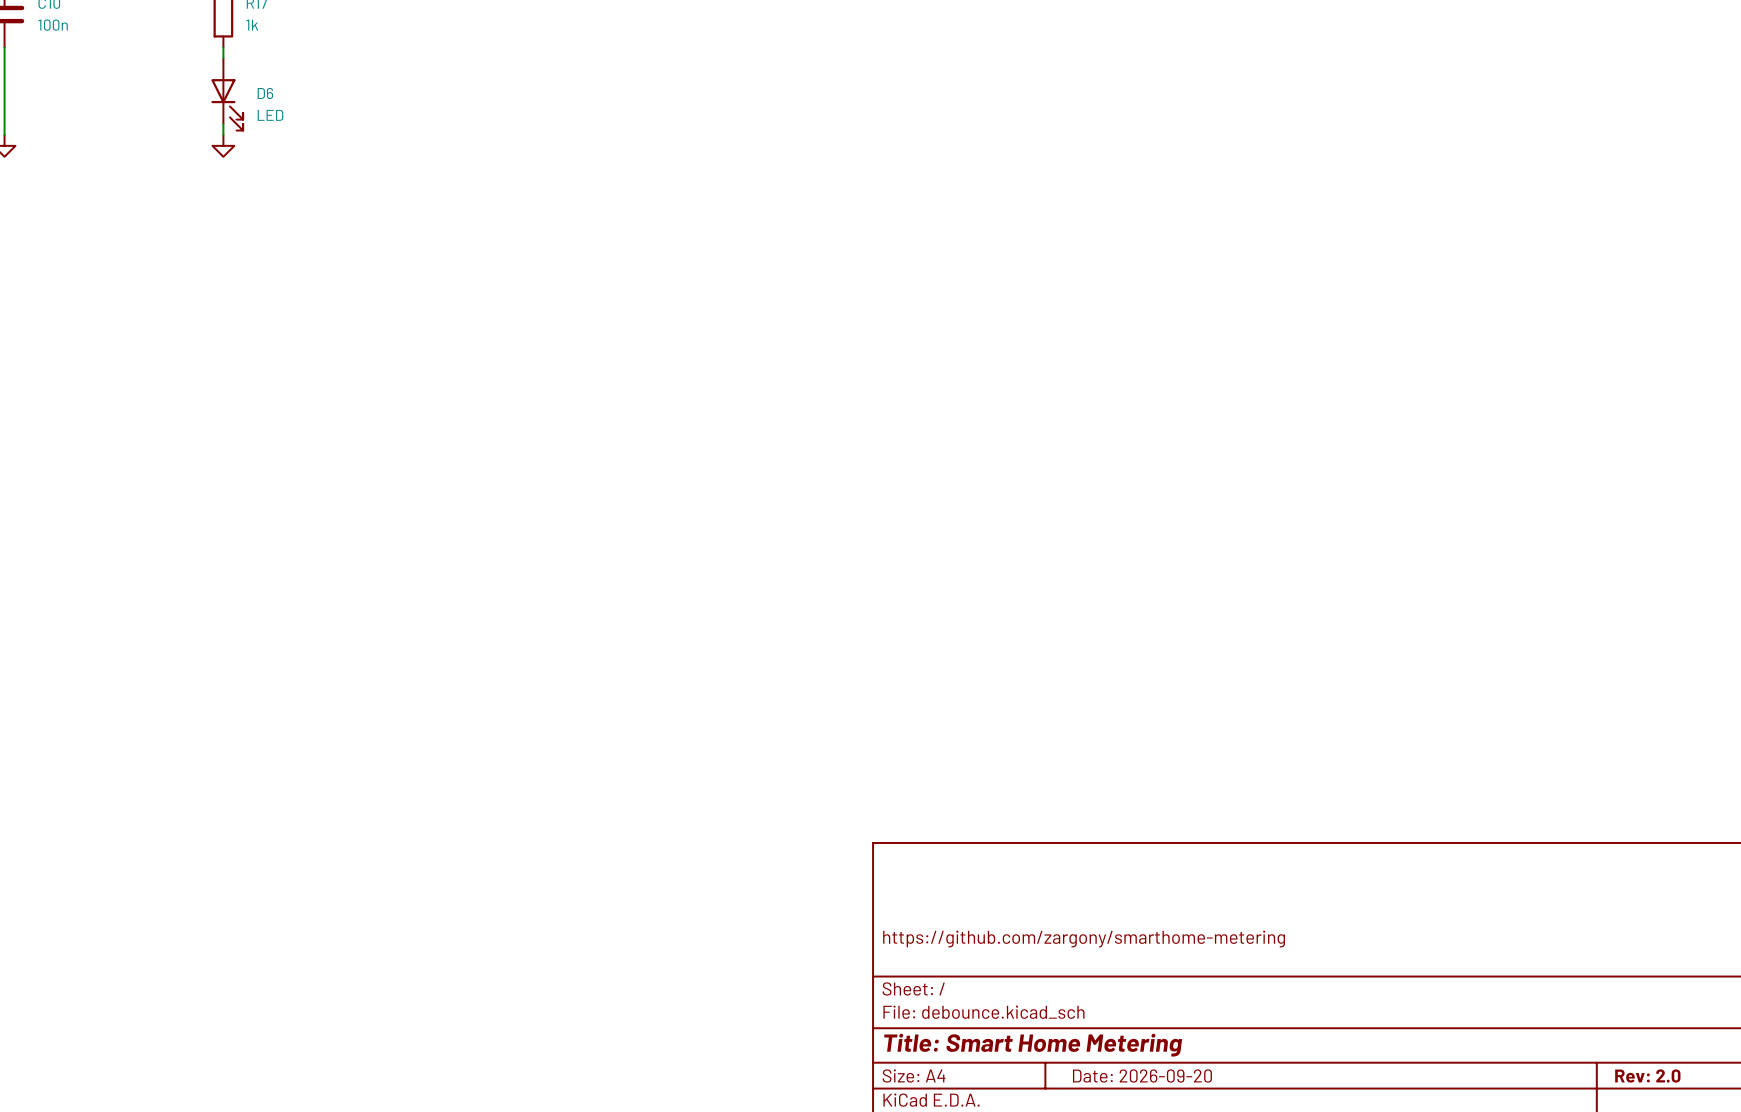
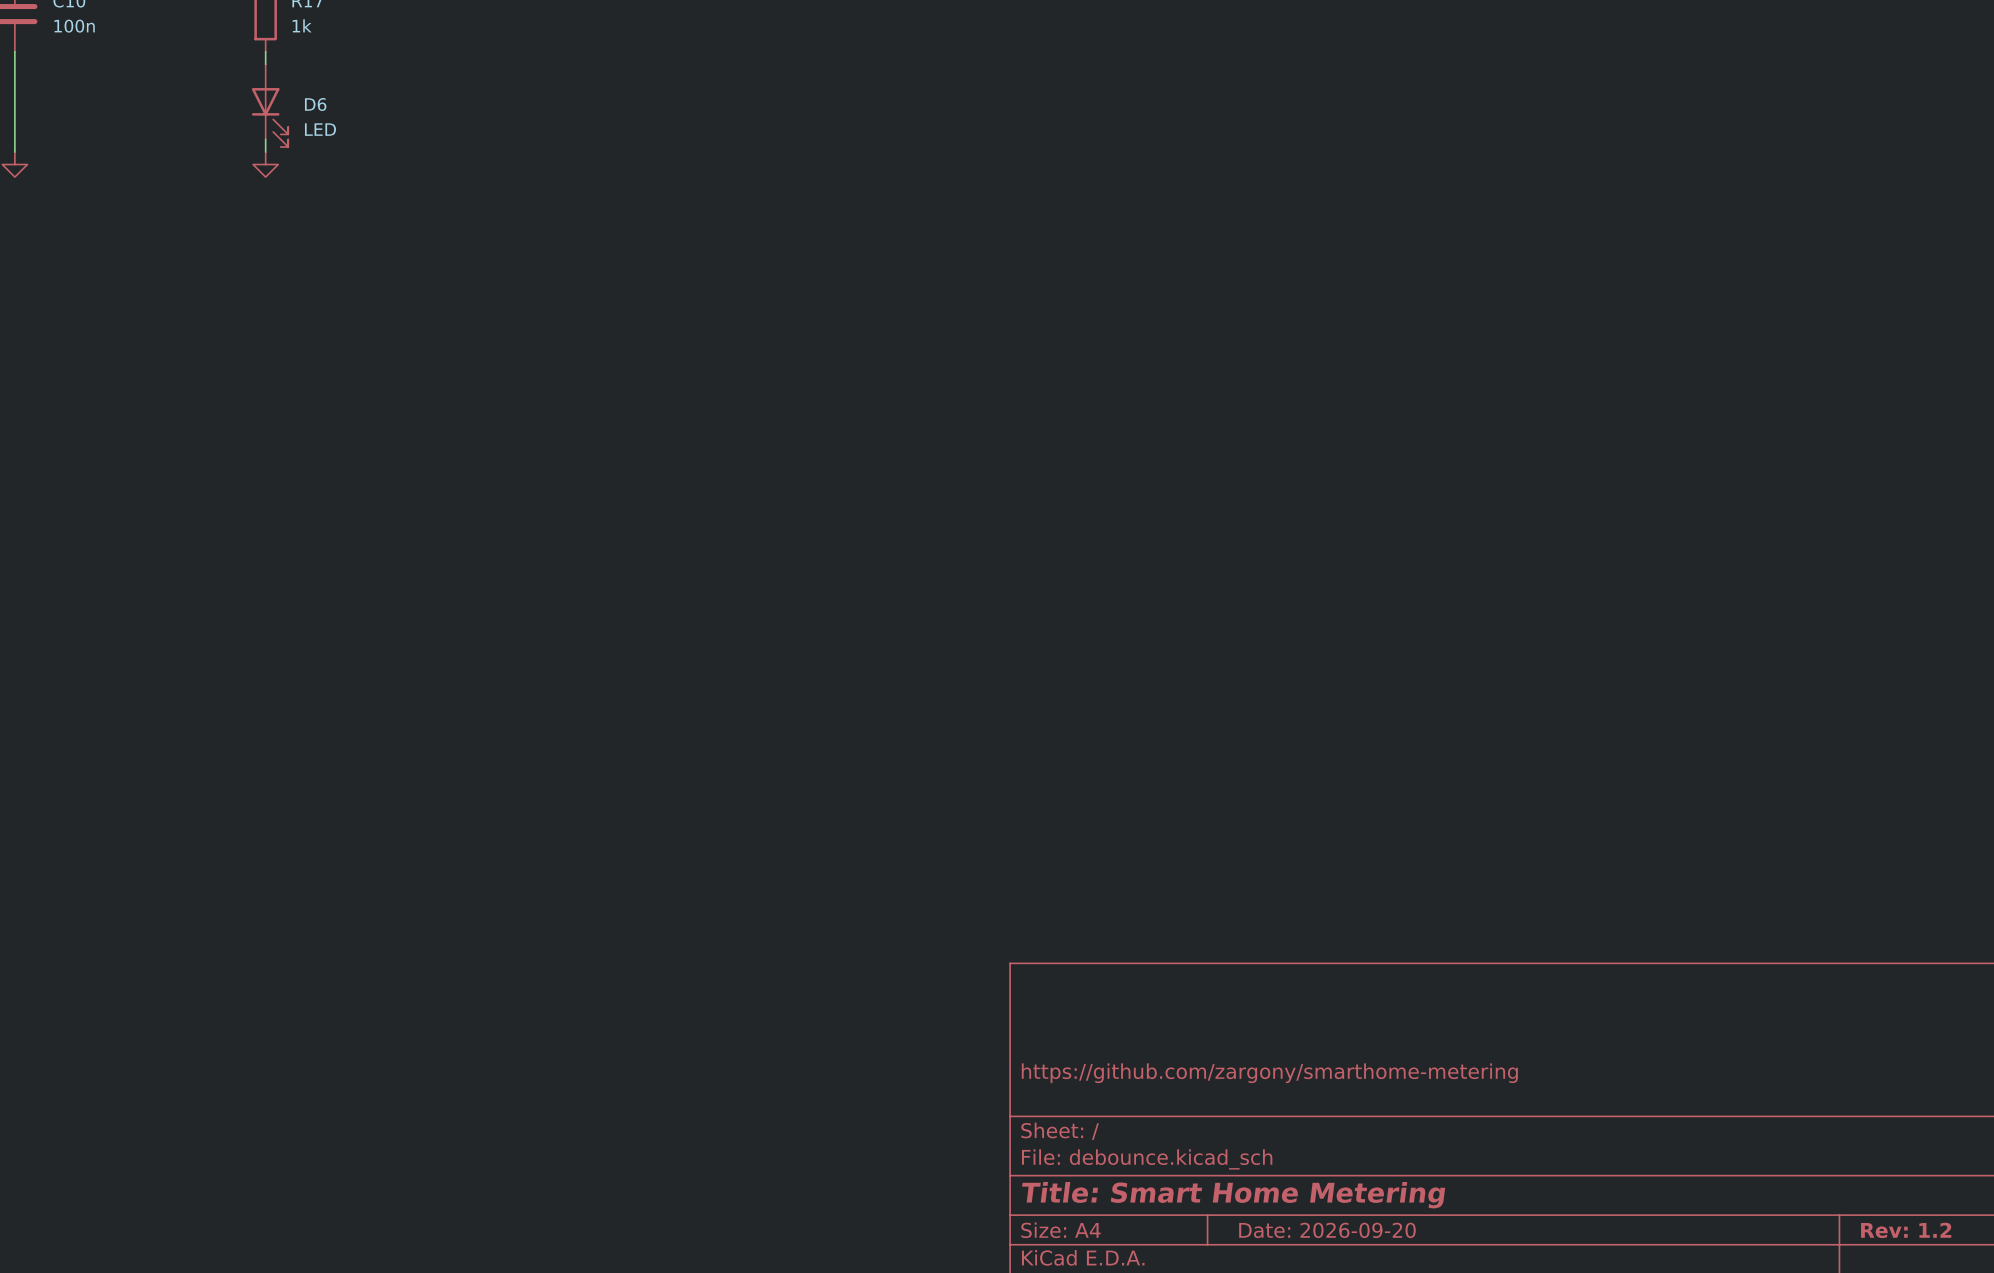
title block: Rev: 2.0 (1647, 1076) -> Rev: 1.2 (1906, 1230)

